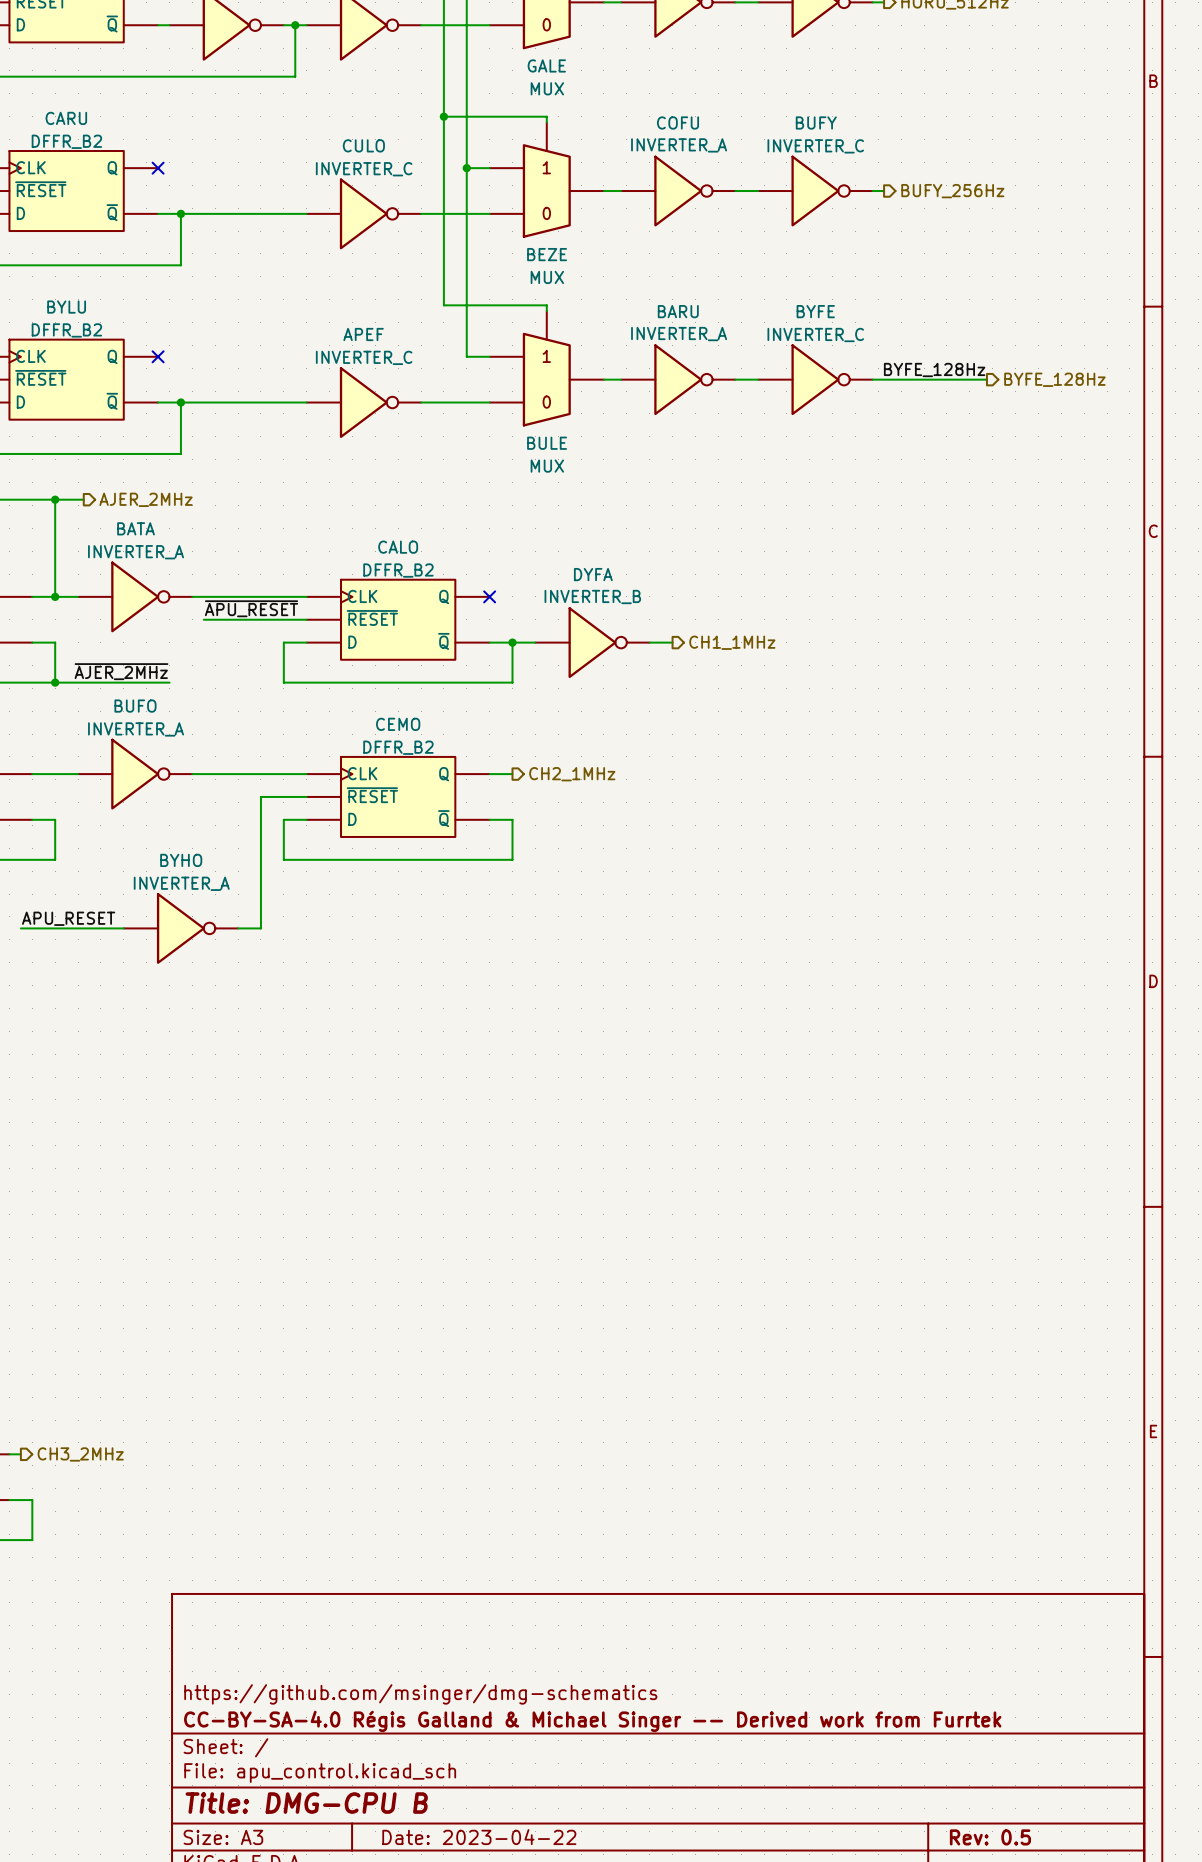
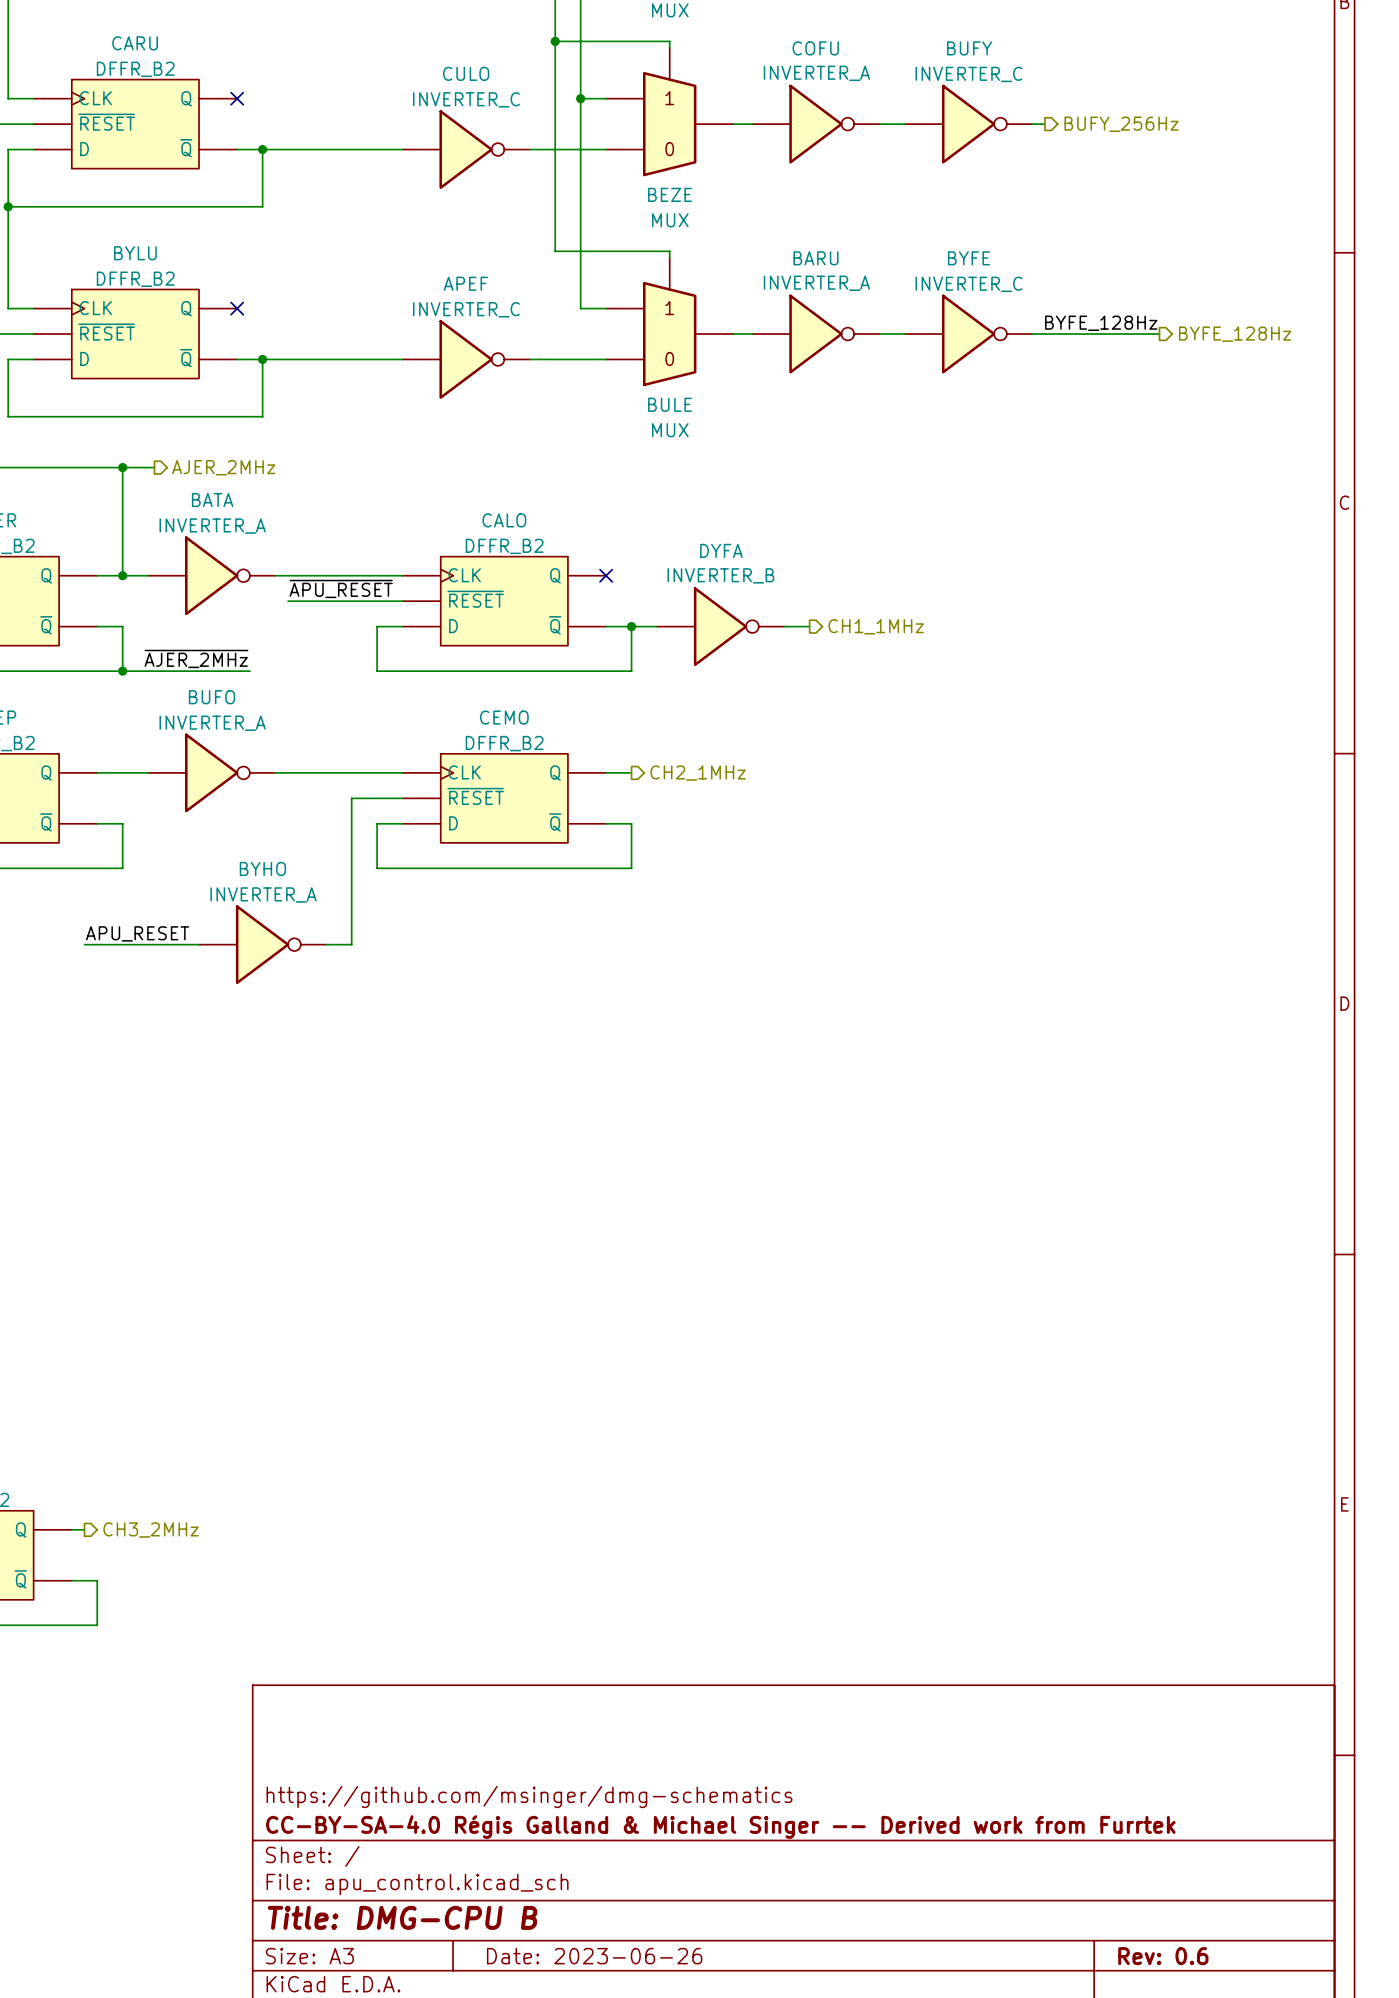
title block: Date: 2023-04-22 (479, 1837) -> Date: 2023-06-26 (594, 1956)
title block: Rev: 0.5 (990, 1837) -> Rev: 0.6 (1163, 1956)

